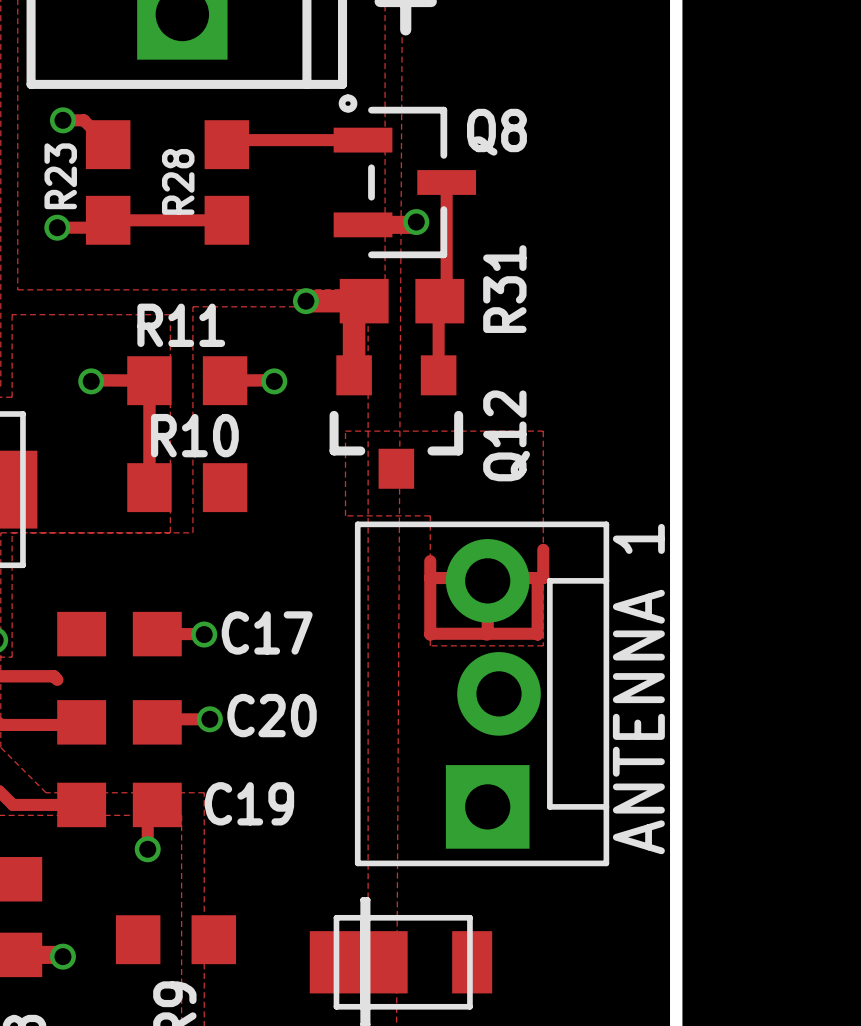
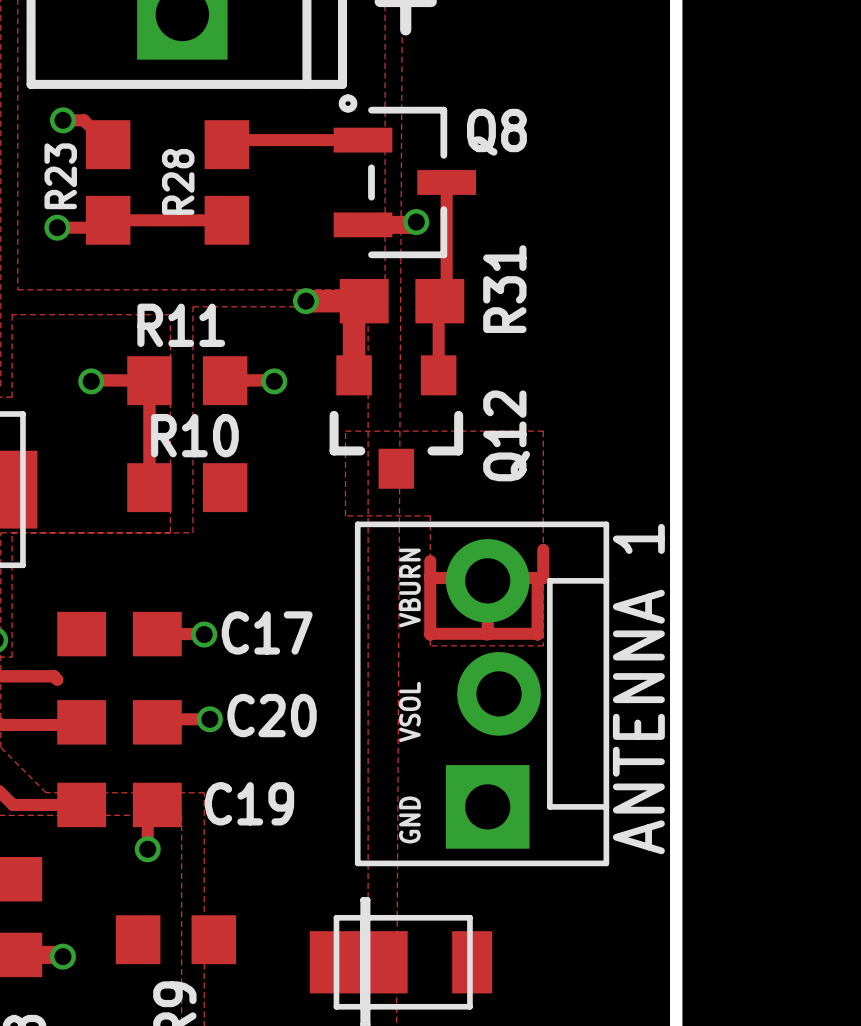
text: none -> VBURN (409, 587)
text: none -> VSOL (409, 711)
text: none -> GND (409, 819)

